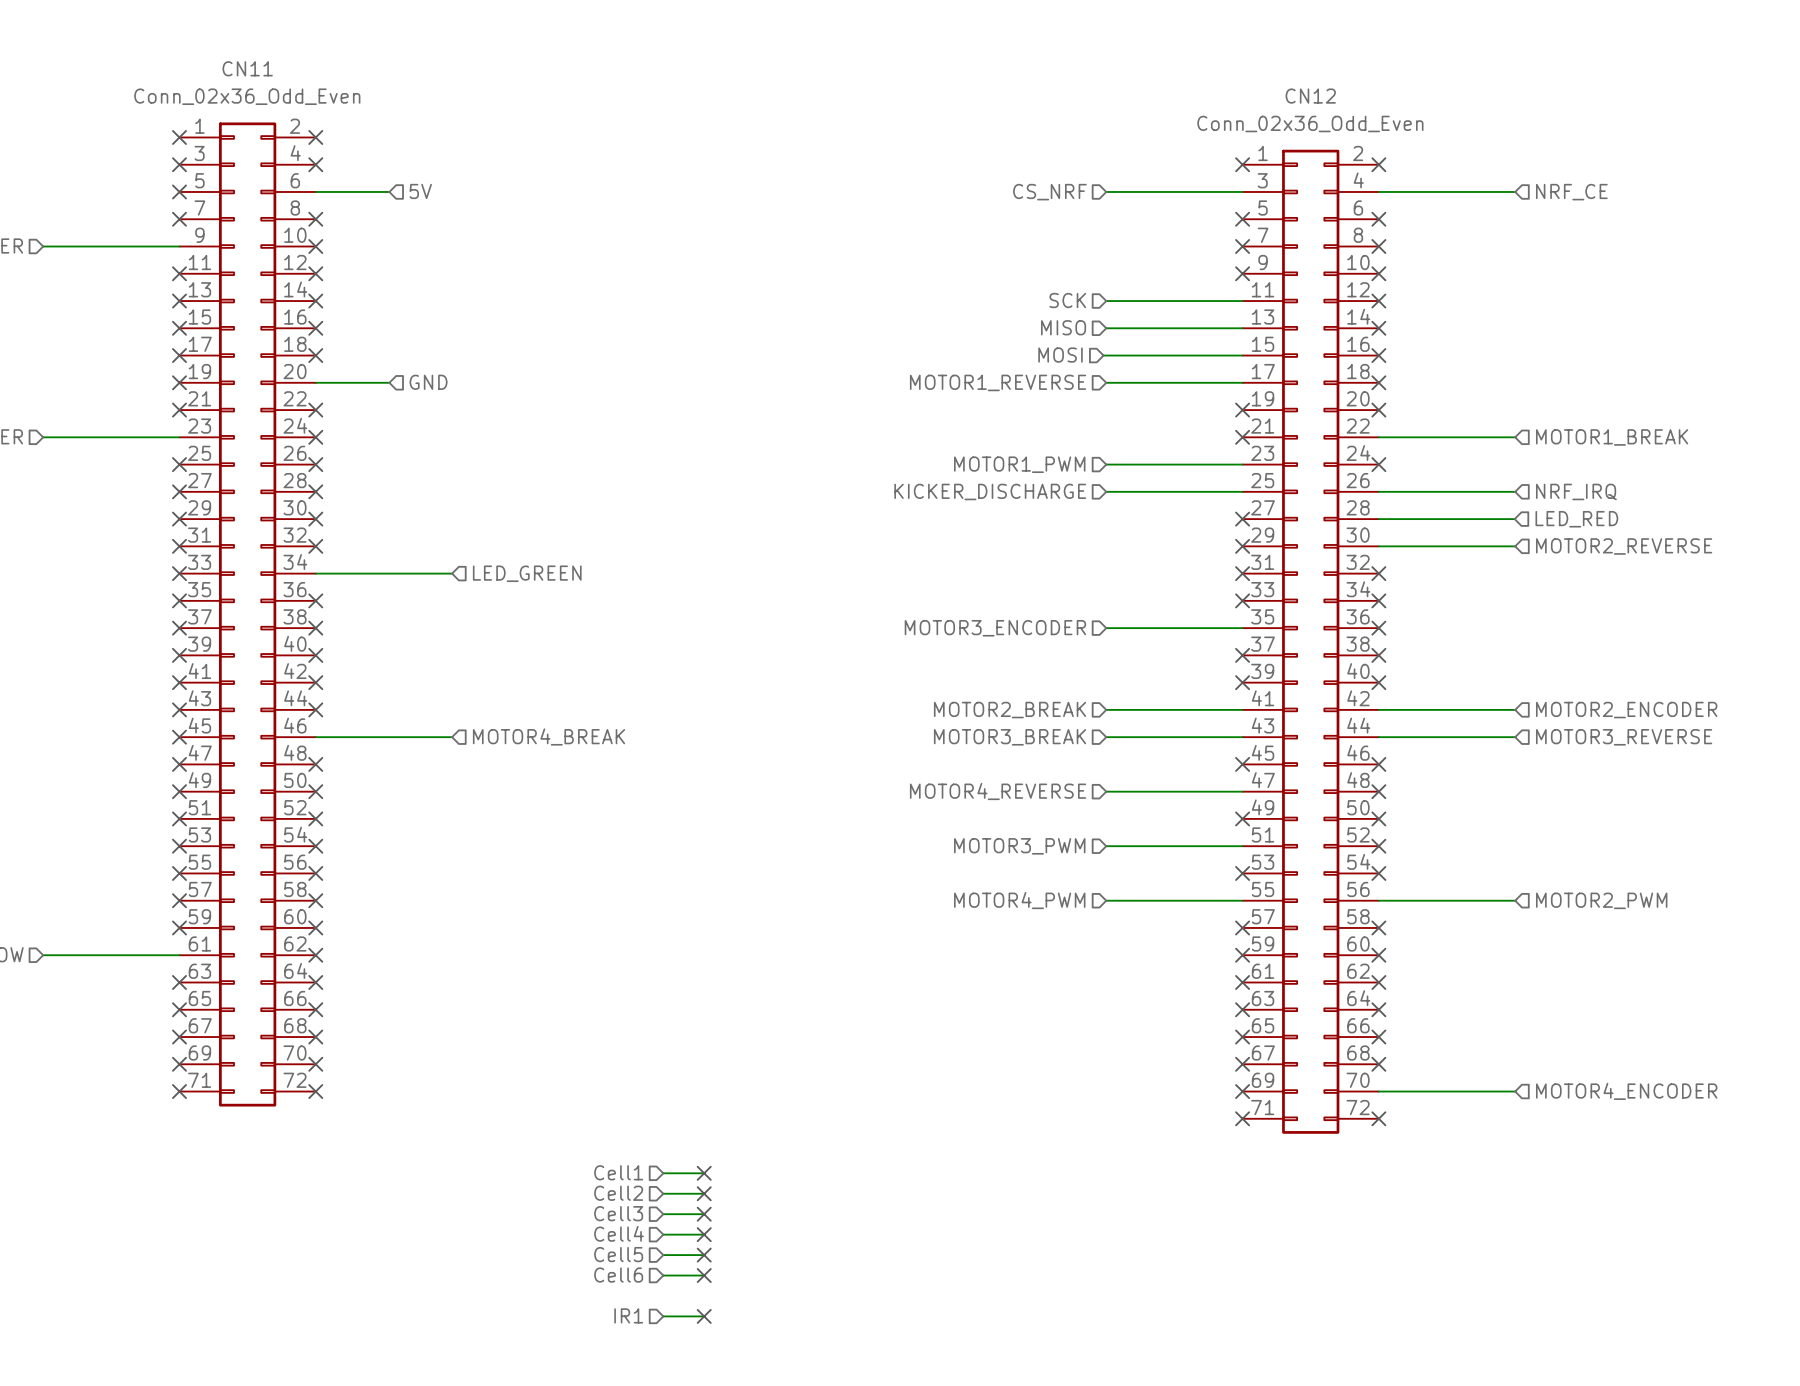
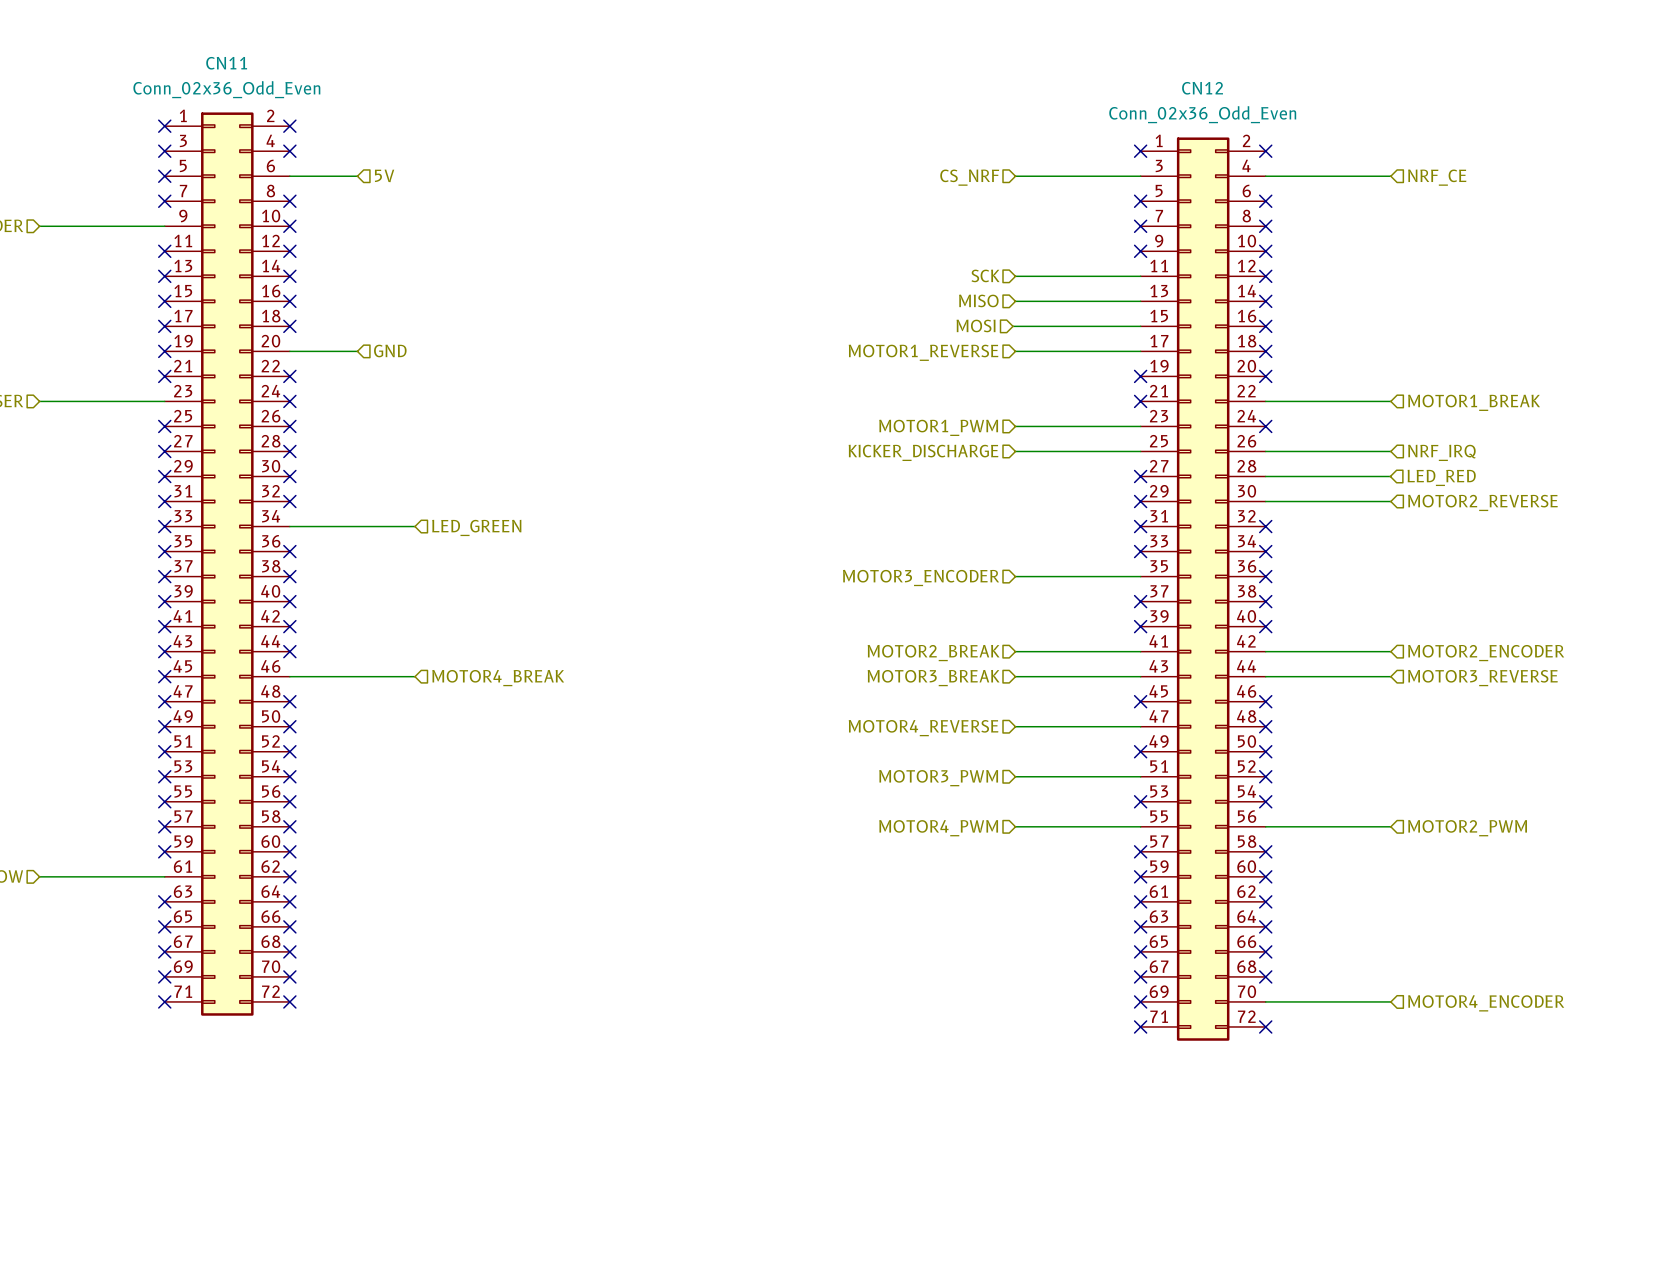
hierarchical label: Cell1 (618, 1172) -> none
wire: (663, 1173) (704, 1173) -> none
no-connect mark: (704, 1173) -> none
hierarchical label: Cell2 (618, 1193) -> none
wire: (663, 1193) (704, 1193) -> none
no-connect mark: (704, 1193) -> none
hierarchical label: Cell3 (618, 1213) -> none
wire: (663, 1214) (704, 1214) -> none
no-connect mark: (704, 1214) -> none
hierarchical label: Cell4 (618, 1233) -> none
wire: (663, 1234) (704, 1234) -> none
no-connect mark: (704, 1234) -> none
hierarchical label: Cell5 (618, 1254) -> none
wire: (663, 1255) (704, 1255) -> none
no-connect mark: (704, 1255) -> none
hierarchical label: Cell6 (618, 1275) -> none
wire: (663, 1275) (704, 1275) -> none
no-connect mark: (704, 1275) -> none
hierarchical label: IR1 (628, 1315) -> none
wire: (663, 1316) (704, 1316) -> none
no-connect mark: (704, 1316) -> none

